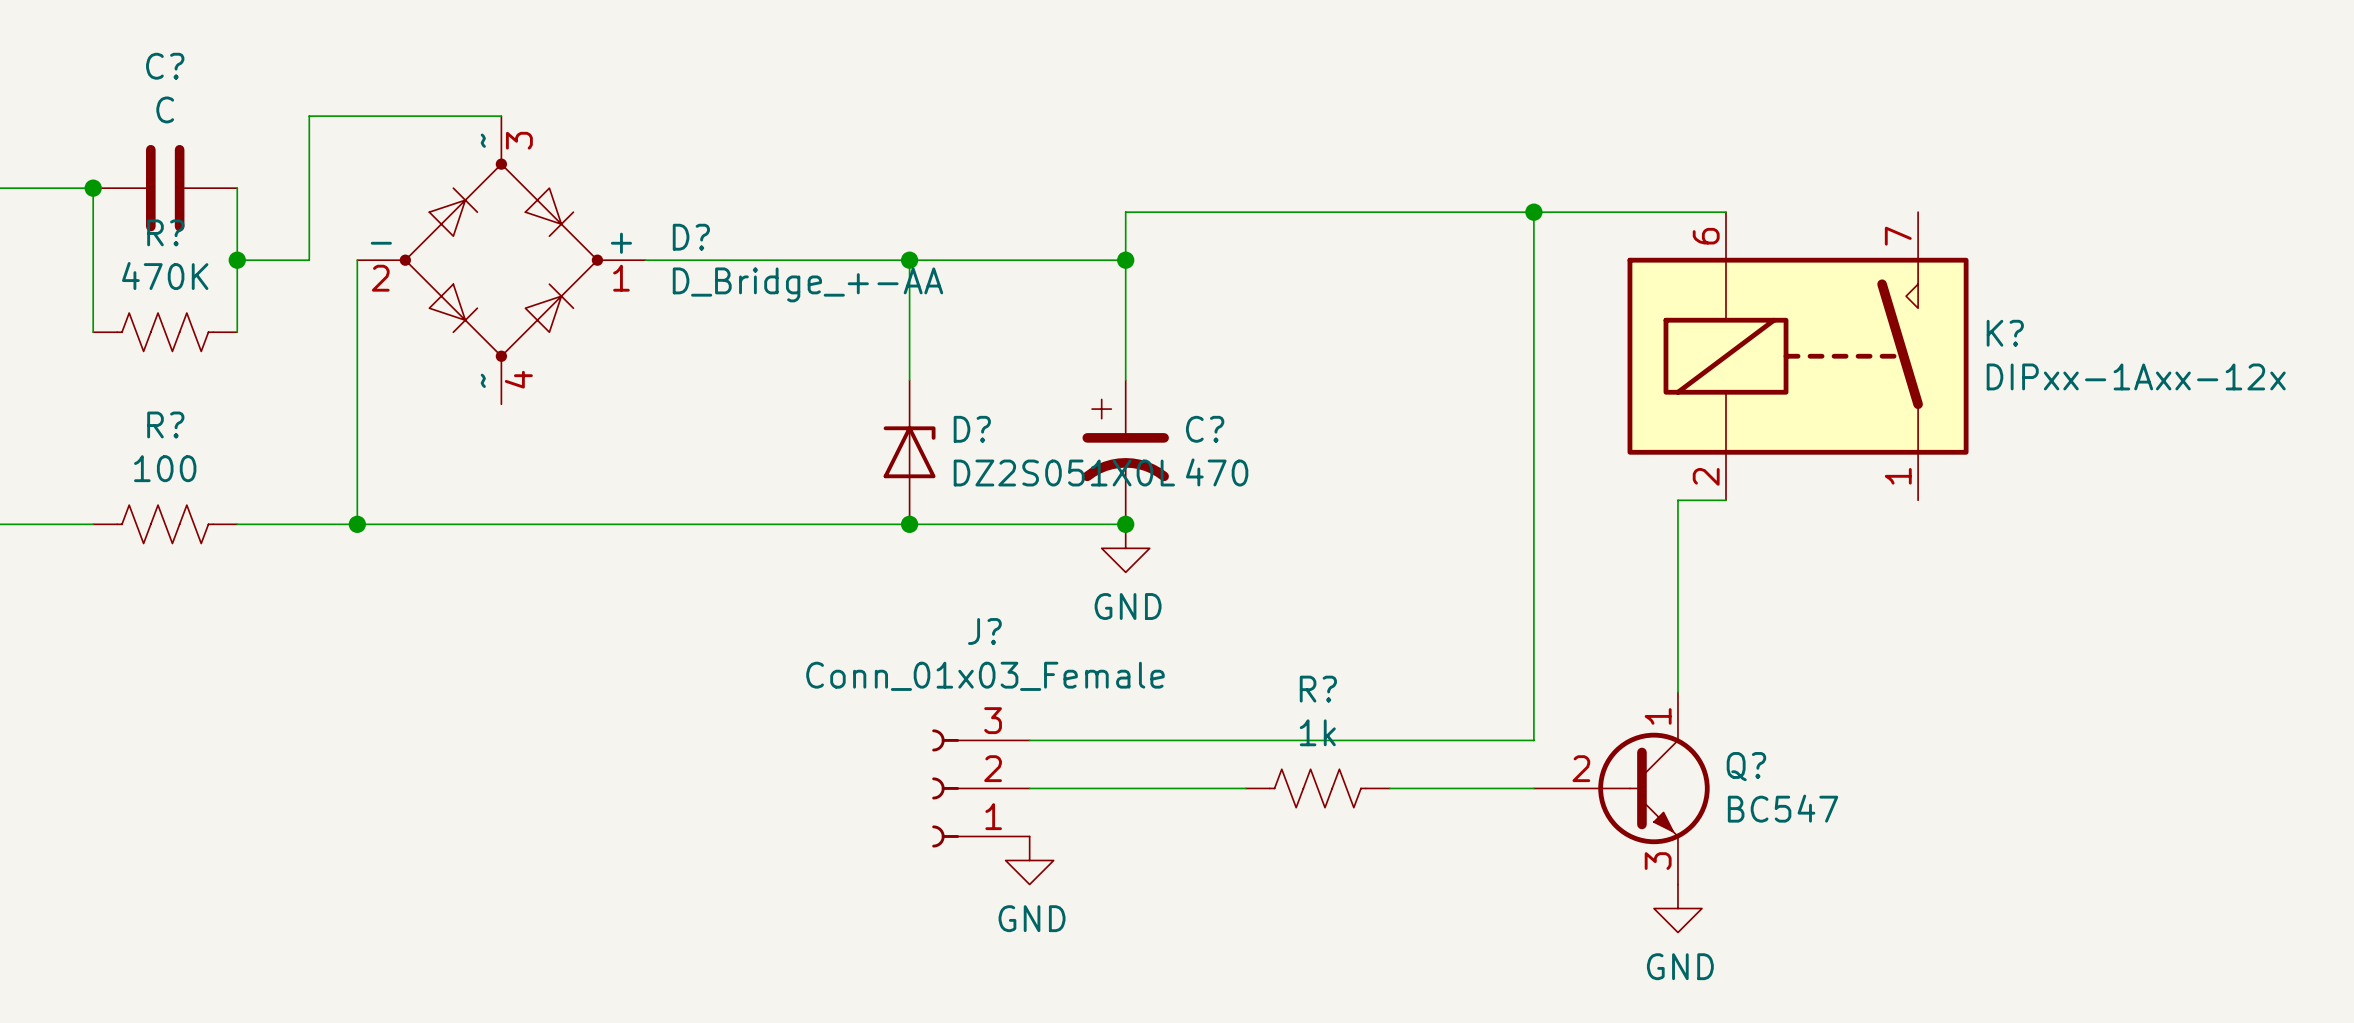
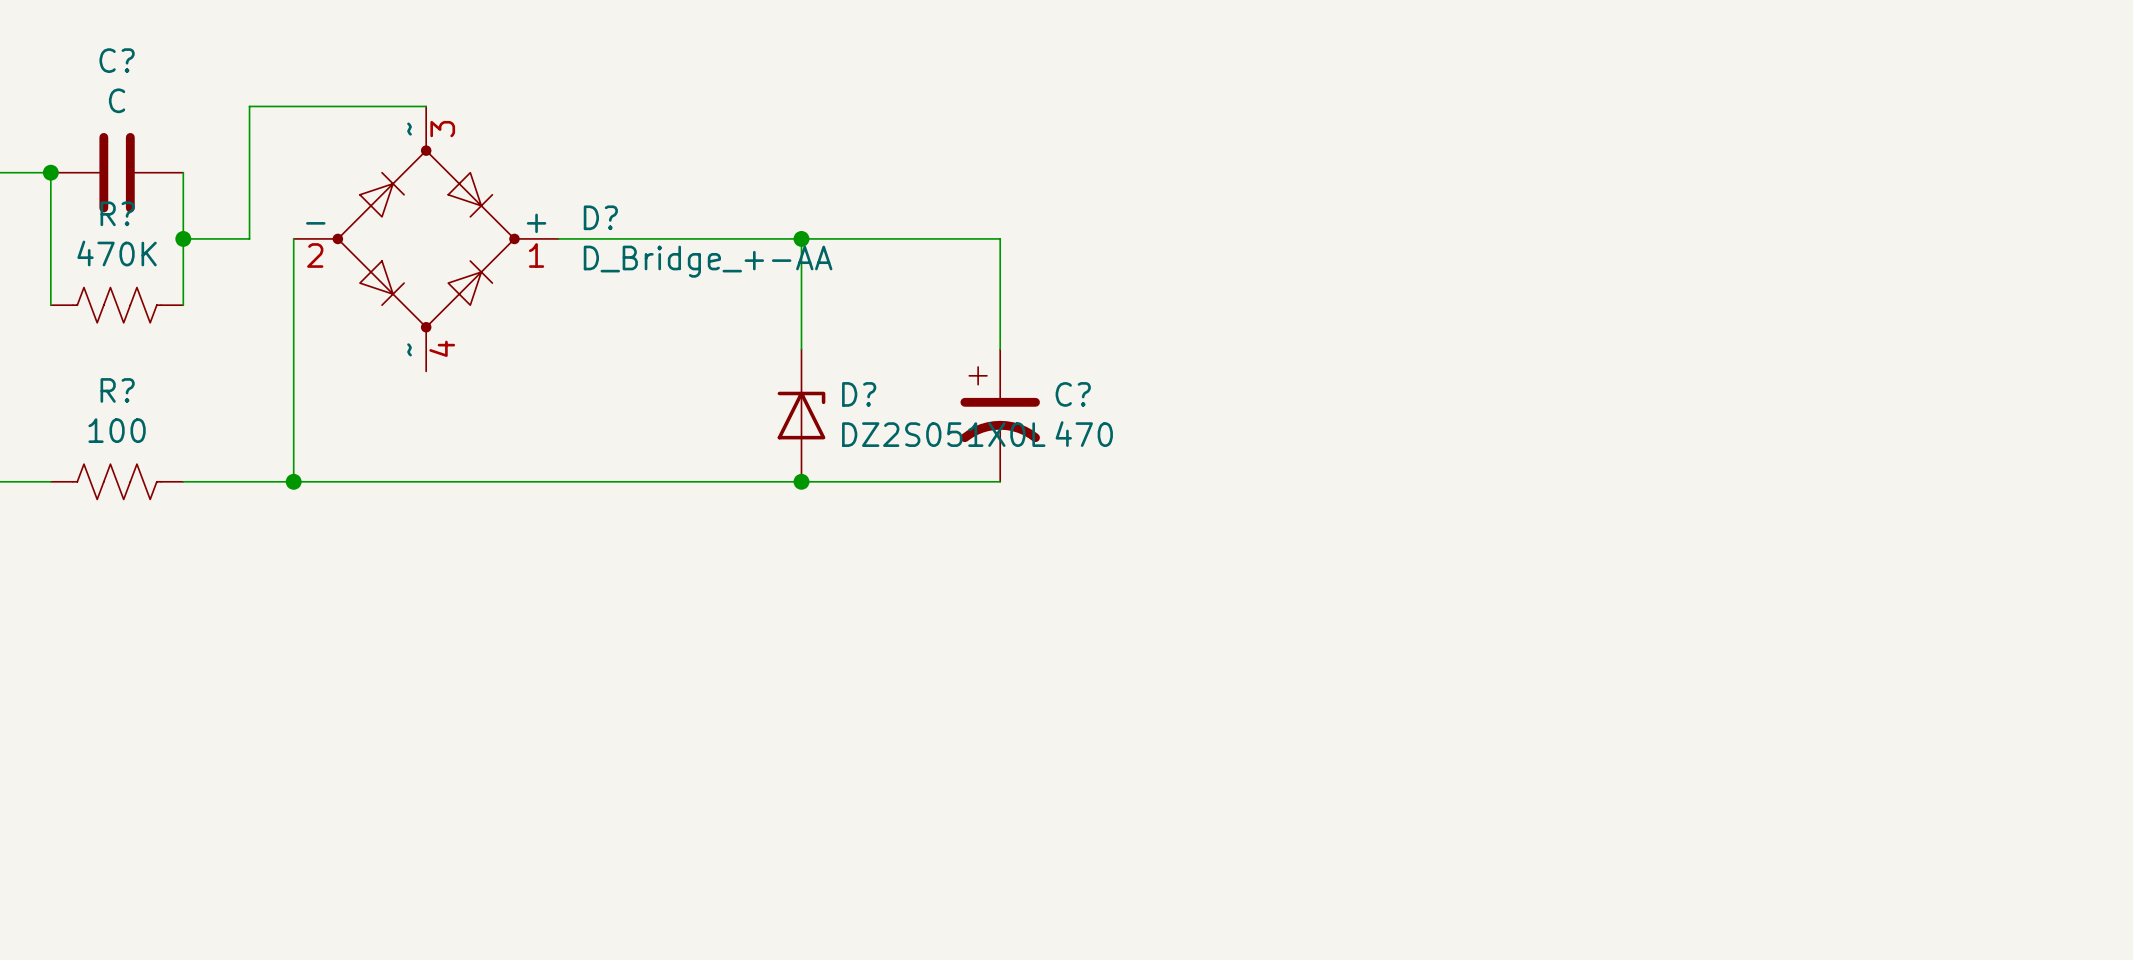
wire: (1533, 212) (1533, 740) (1029, 740) -> none
junction: (1533, 212) -> none
wire: (1726, 212) (1125, 212) (1125, 260) -> none
junction: (1125, 260) -> none
K?: DIPxx-1Axx-12x (1798, 356) -> none
wire: (1726, 500) (1677, 500) (1677, 692) -> none
junction: (1125, 524) -> none
power symbol: GND (1125, 548) -> none
J?: Conn_01x03_Female (980, 788) -> none
wire: (1029, 788) (1245, 788) -> none
R?: 1k (1317, 788) -> none
wire: (1389, 788) (1533, 788) -> none
Q?: BC547 (1621, 788) -> none
power symbol: GND (1029, 860) -> none
power symbol: GND (1677, 908) -> none

